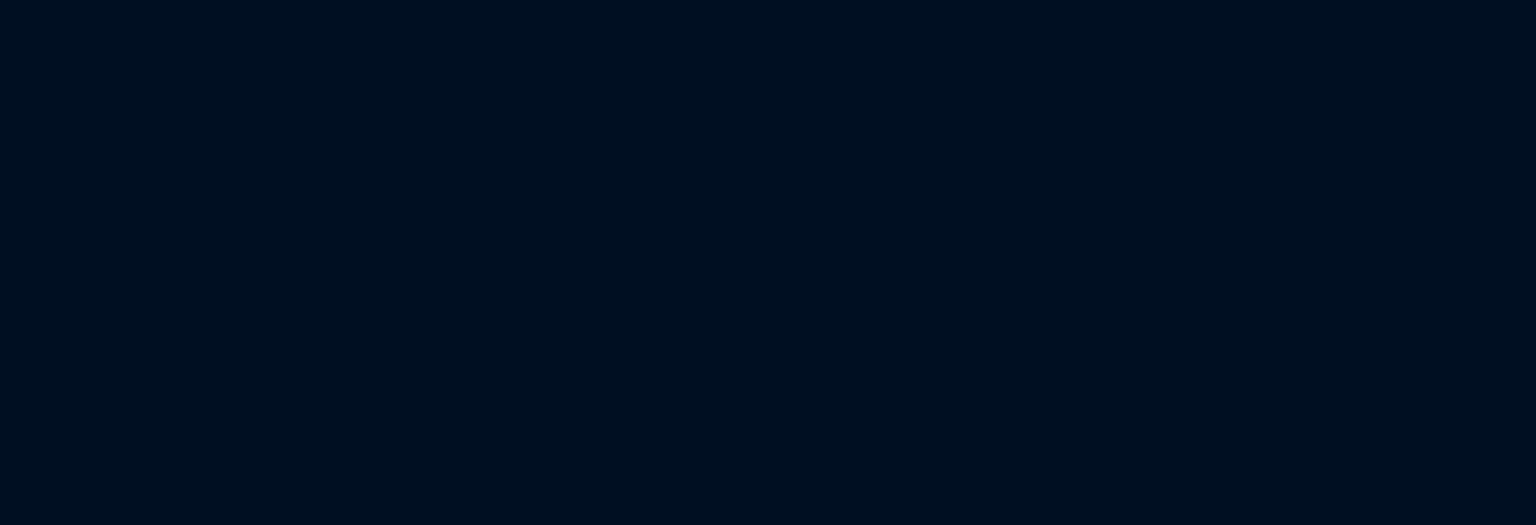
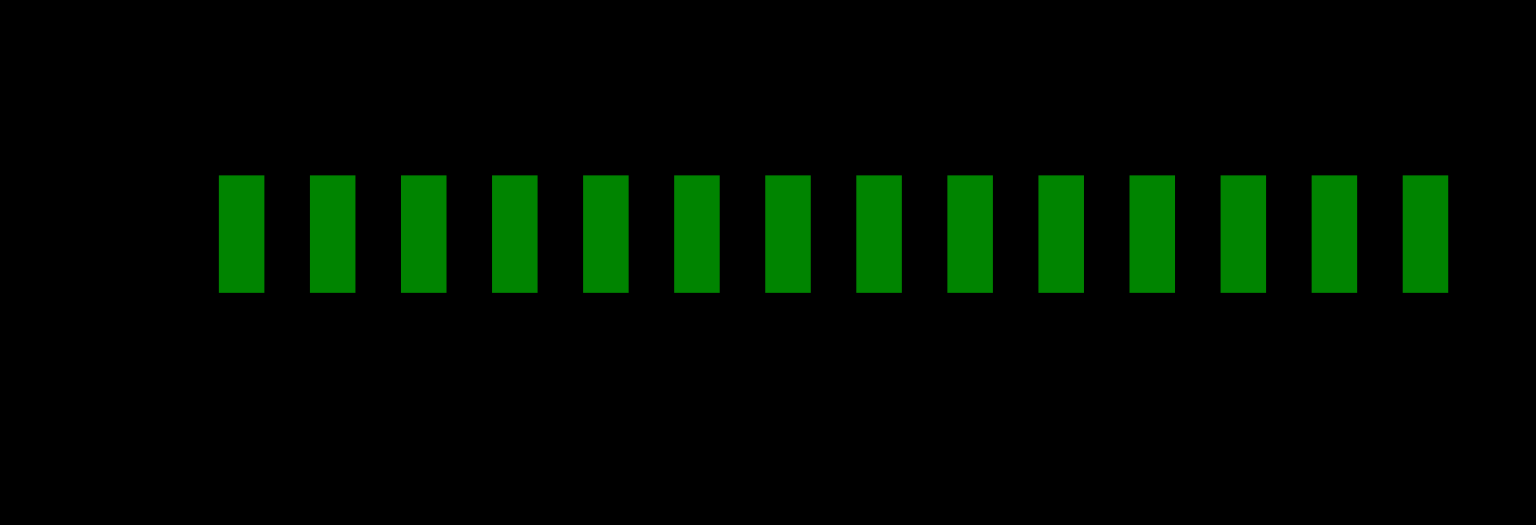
part: none -> (833, 234)

